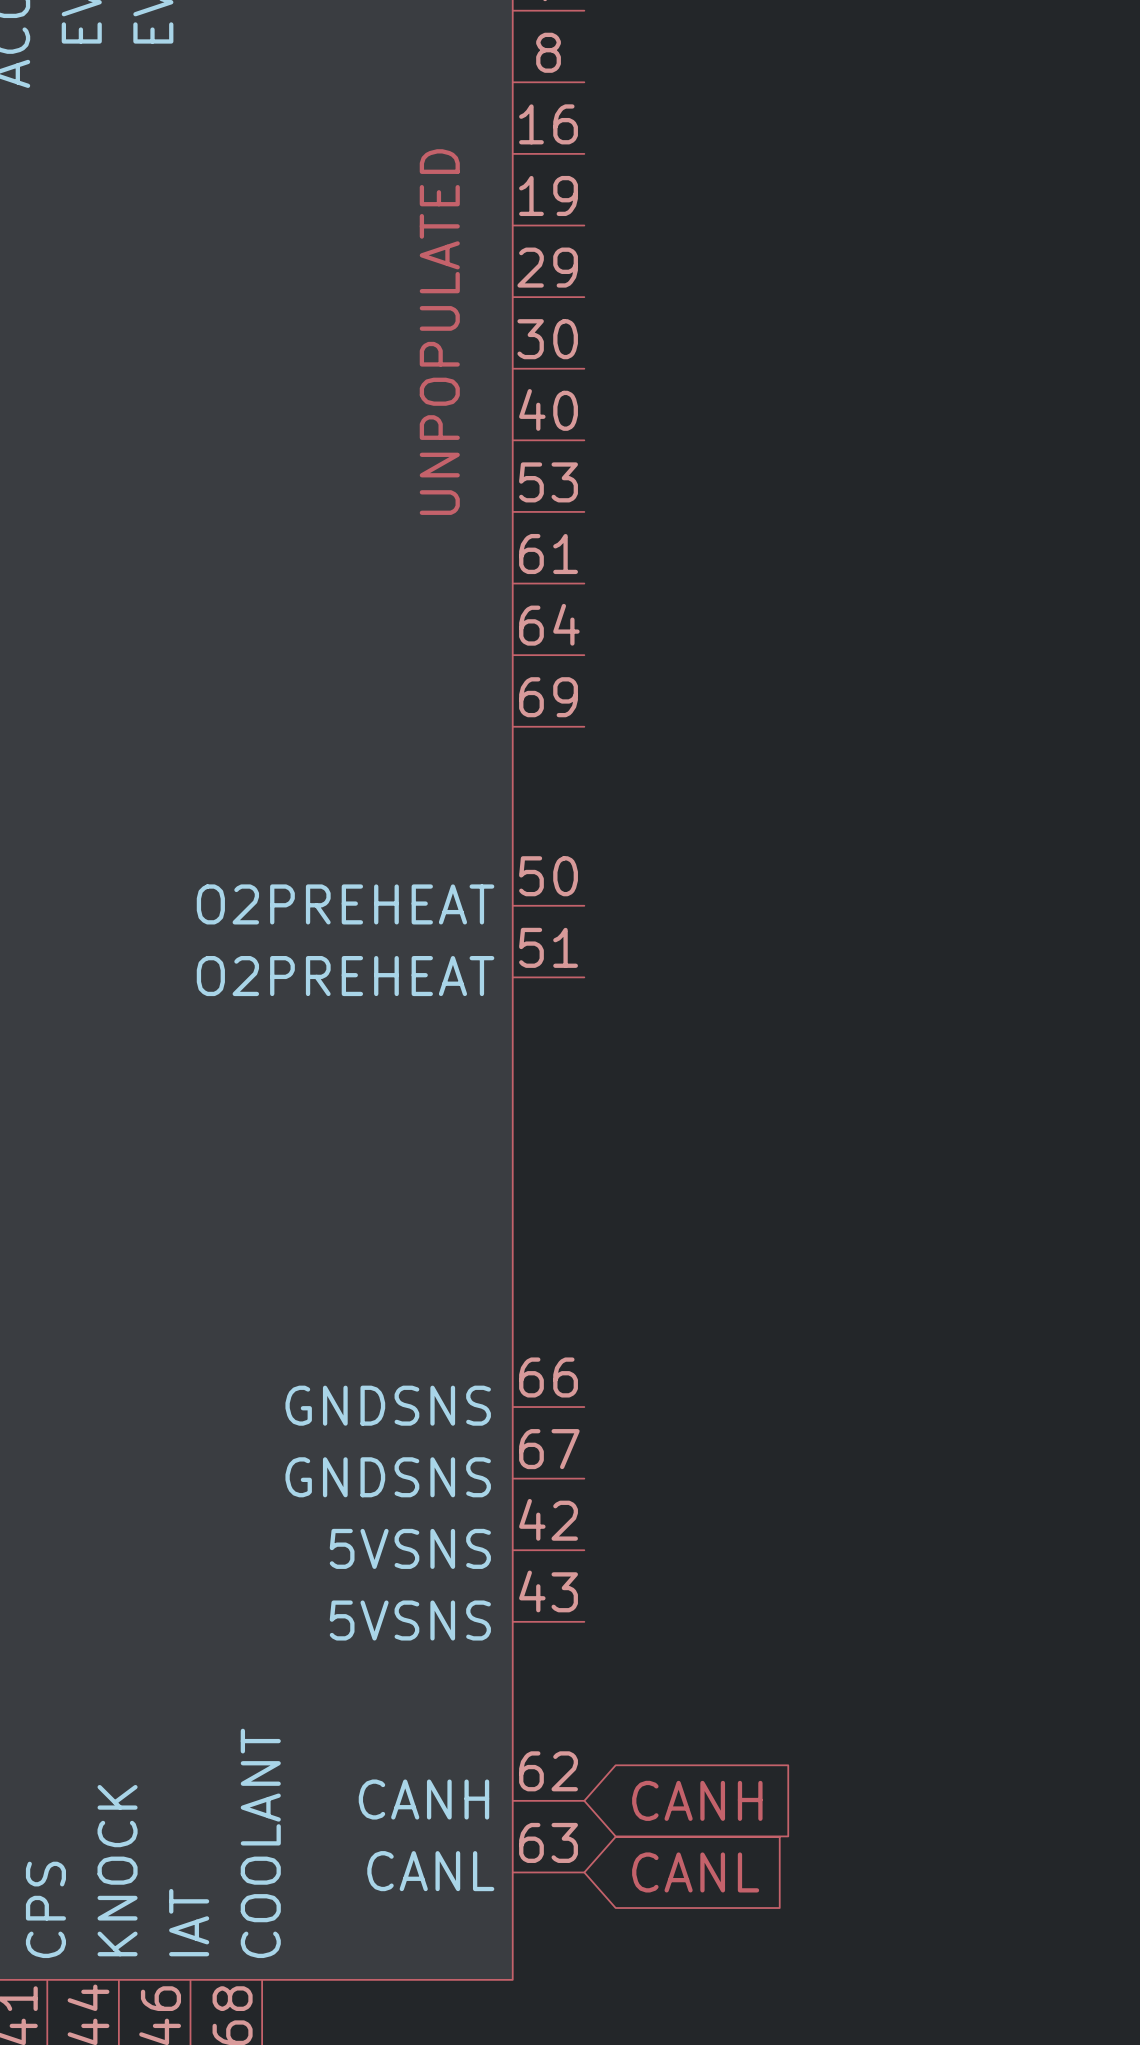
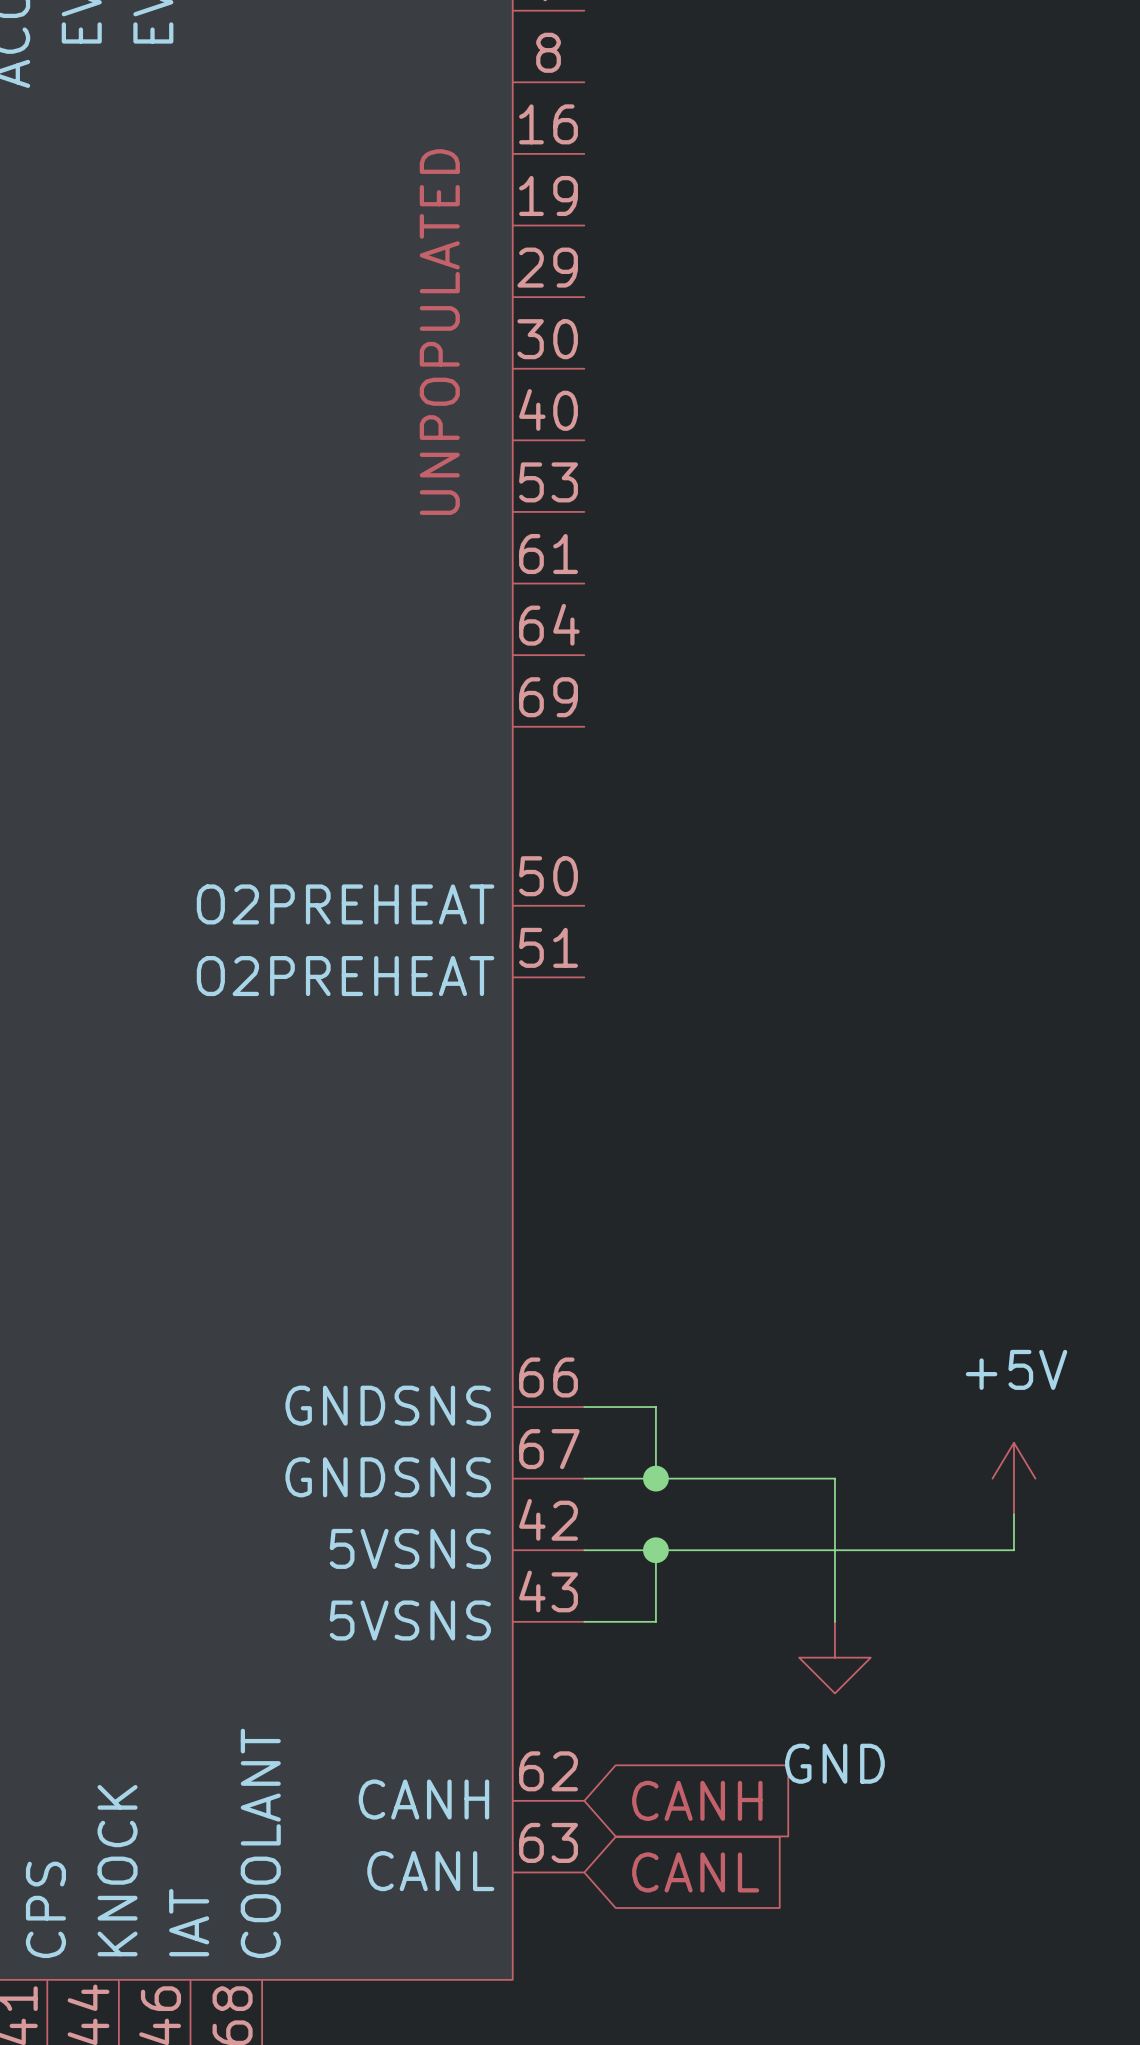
wire: none -> (584, 1407) (655, 1407) (655, 1478)
wire: none -> (584, 1478) (834, 1478) (834, 1621)
junction: none -> (655, 1478)
power symbol: none -> +5V (1013, 1478)
wire: none -> (1013, 1514) (1013, 1550) (584, 1550)
wire: none -> (655, 1550) (655, 1621) (584, 1621)
junction: none -> (655, 1550)
power symbol: none -> GND (834, 1657)

